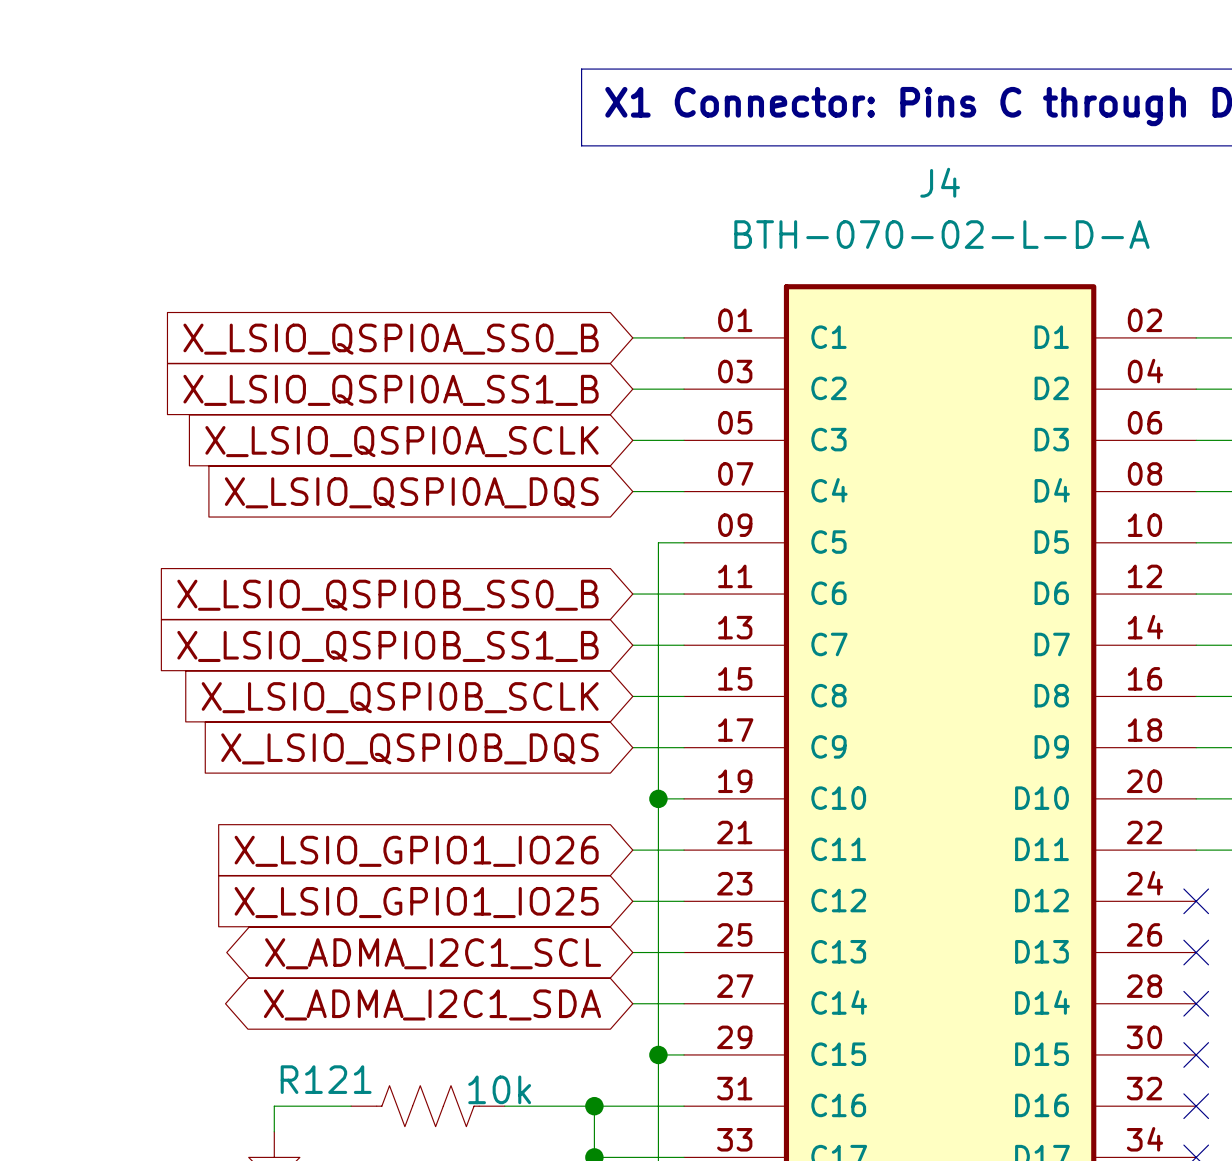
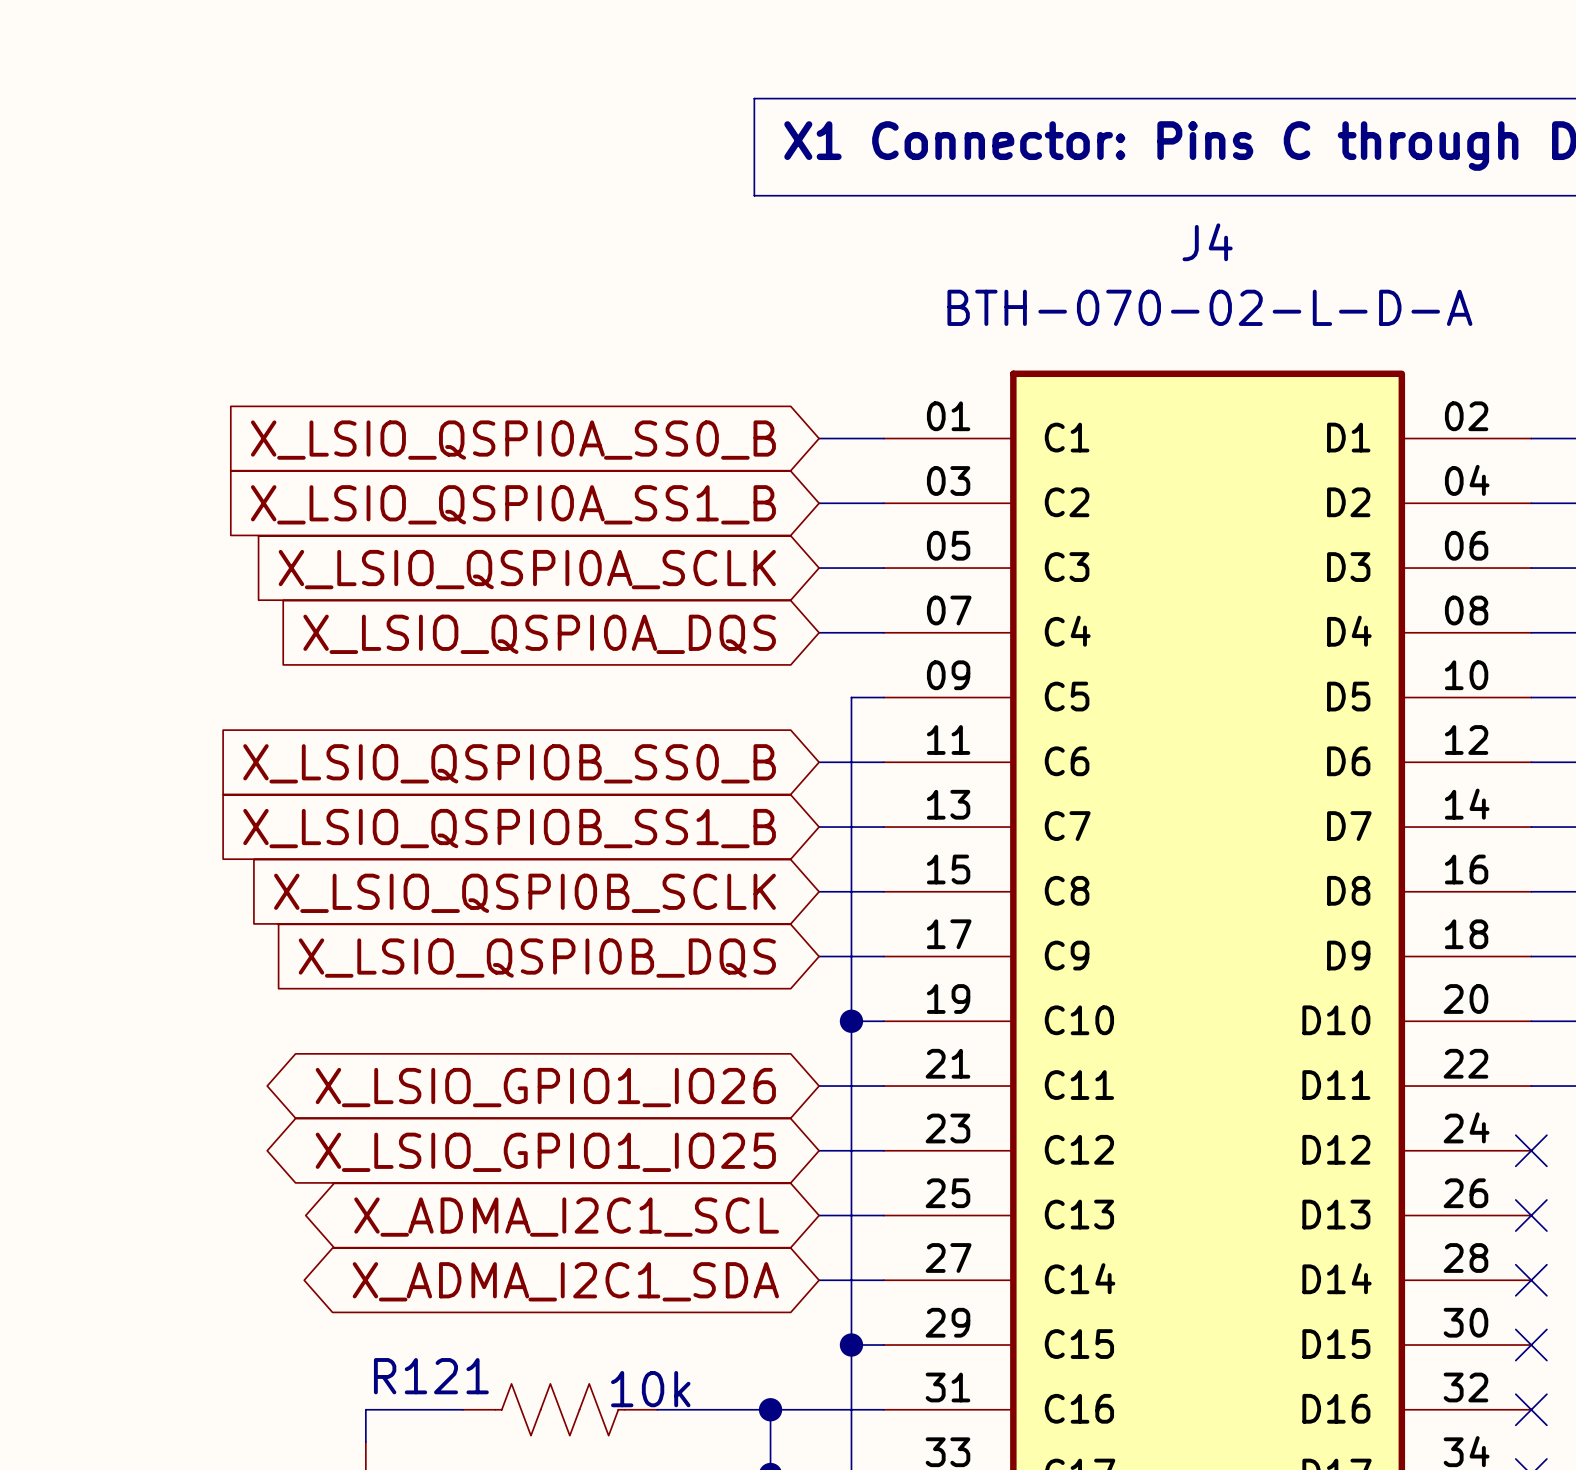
global label shape: input (416, 851) -> bidirectional (545, 1087)
global label shape: input (416, 902) -> bidirectional (545, 1152)

